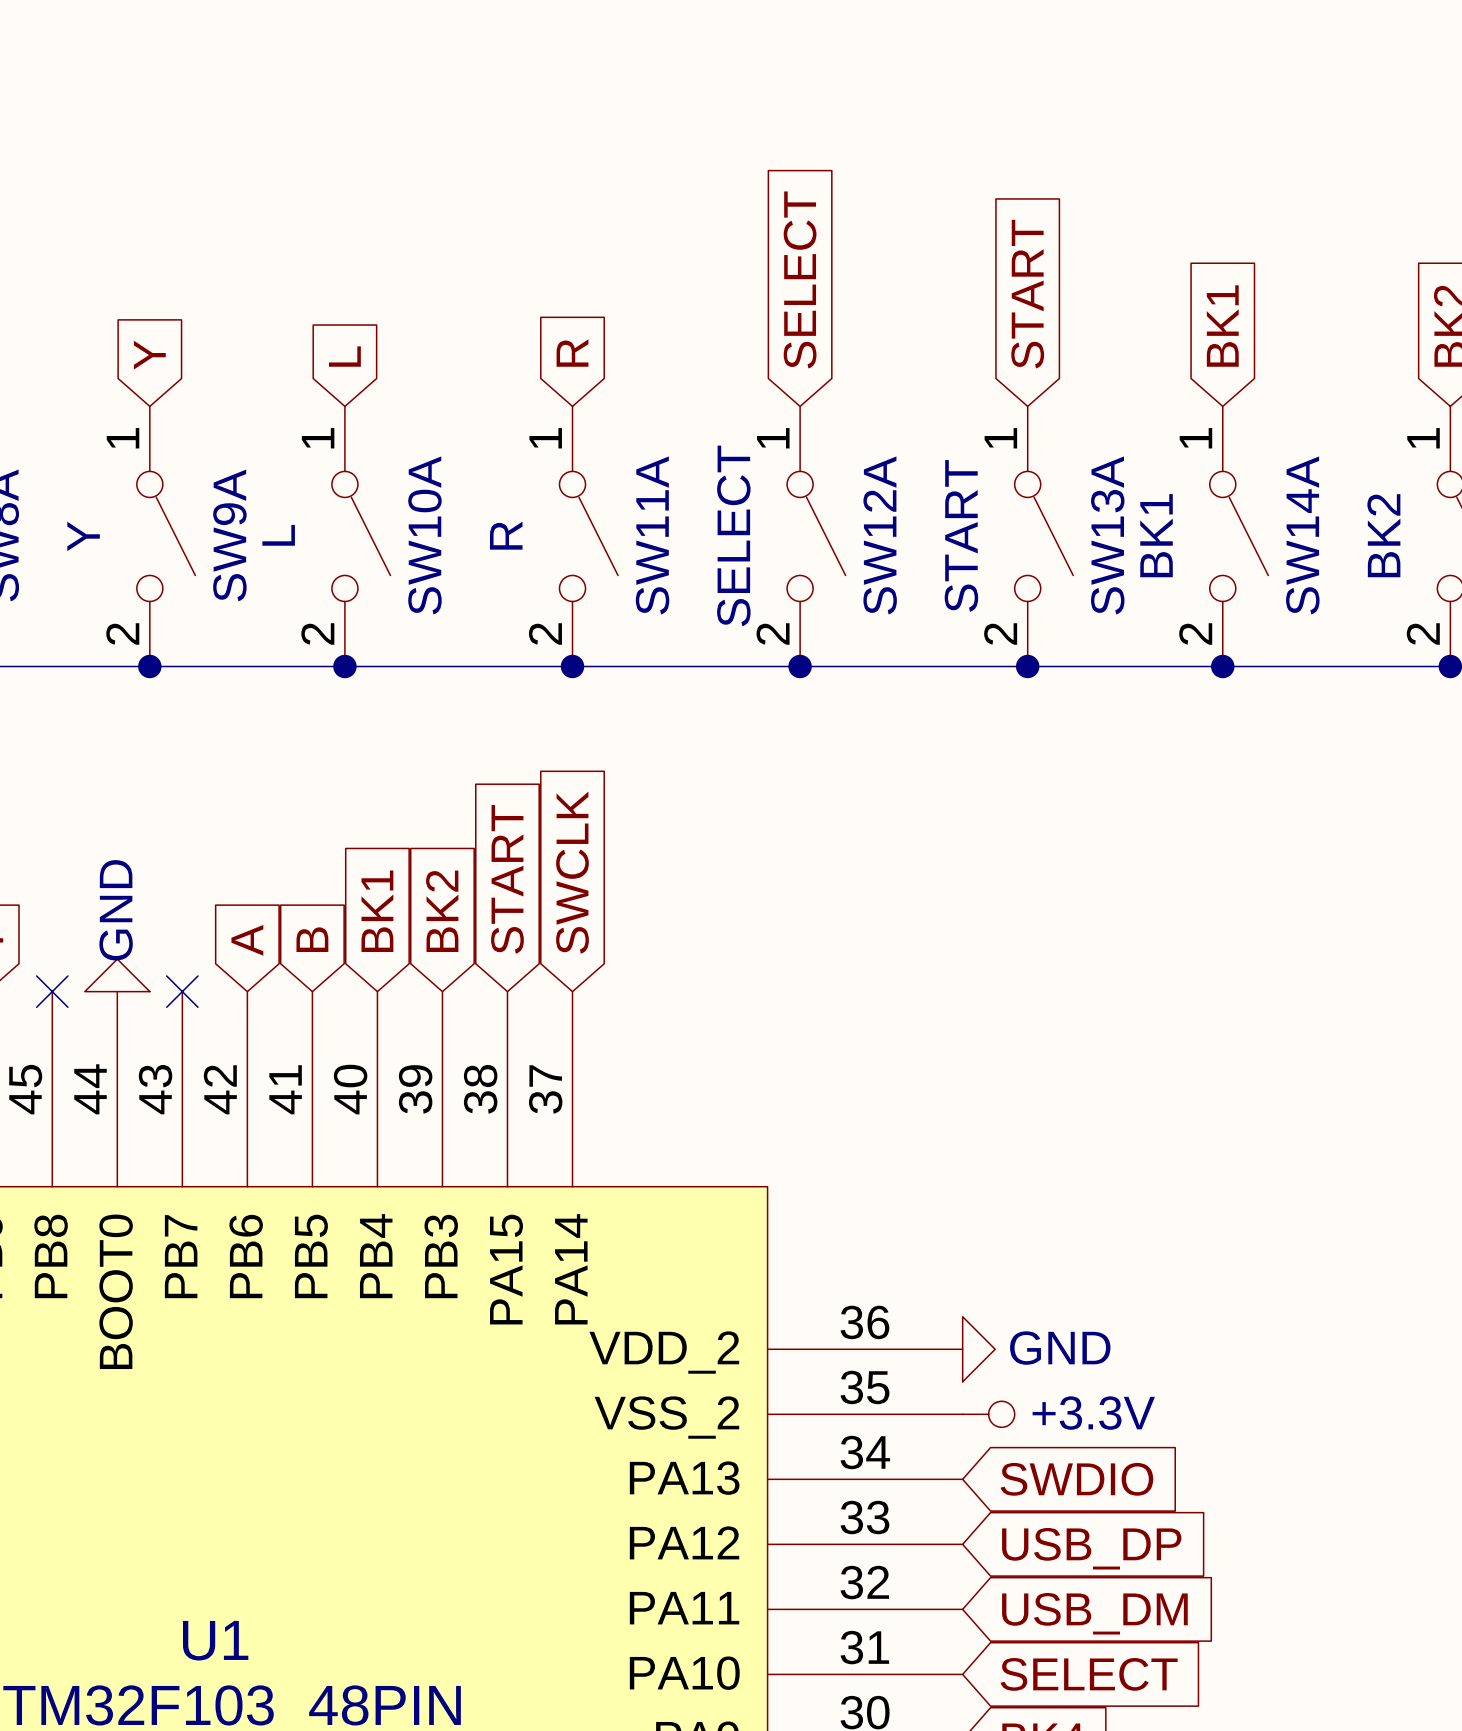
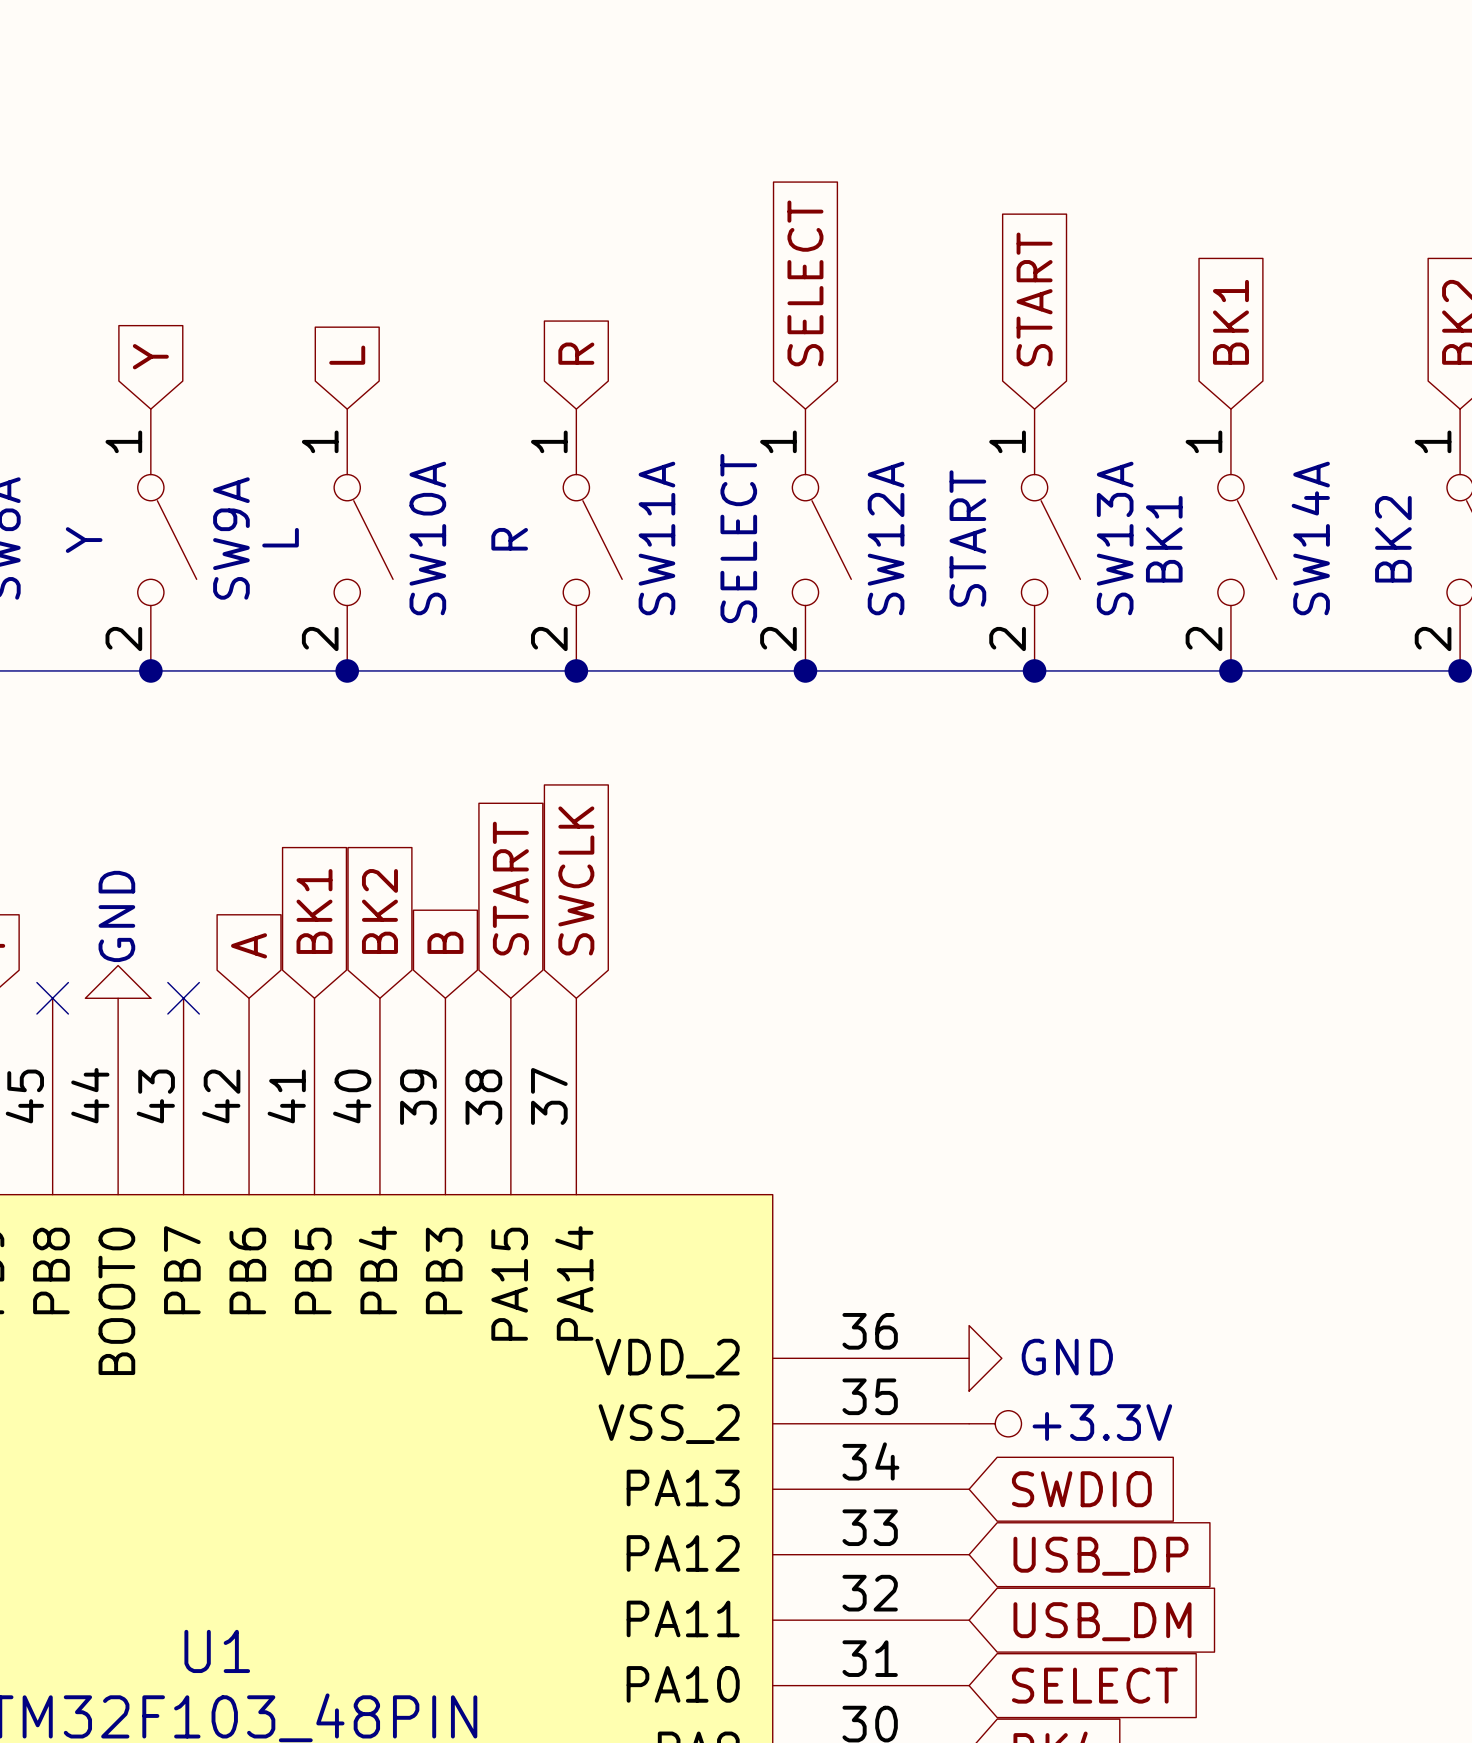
global label: BK1 (377, 911) -> BK2 (379, 911)
global label: BK2 (442, 911) -> B (445, 942)
global label: B (312, 939) -> BK1 (314, 911)

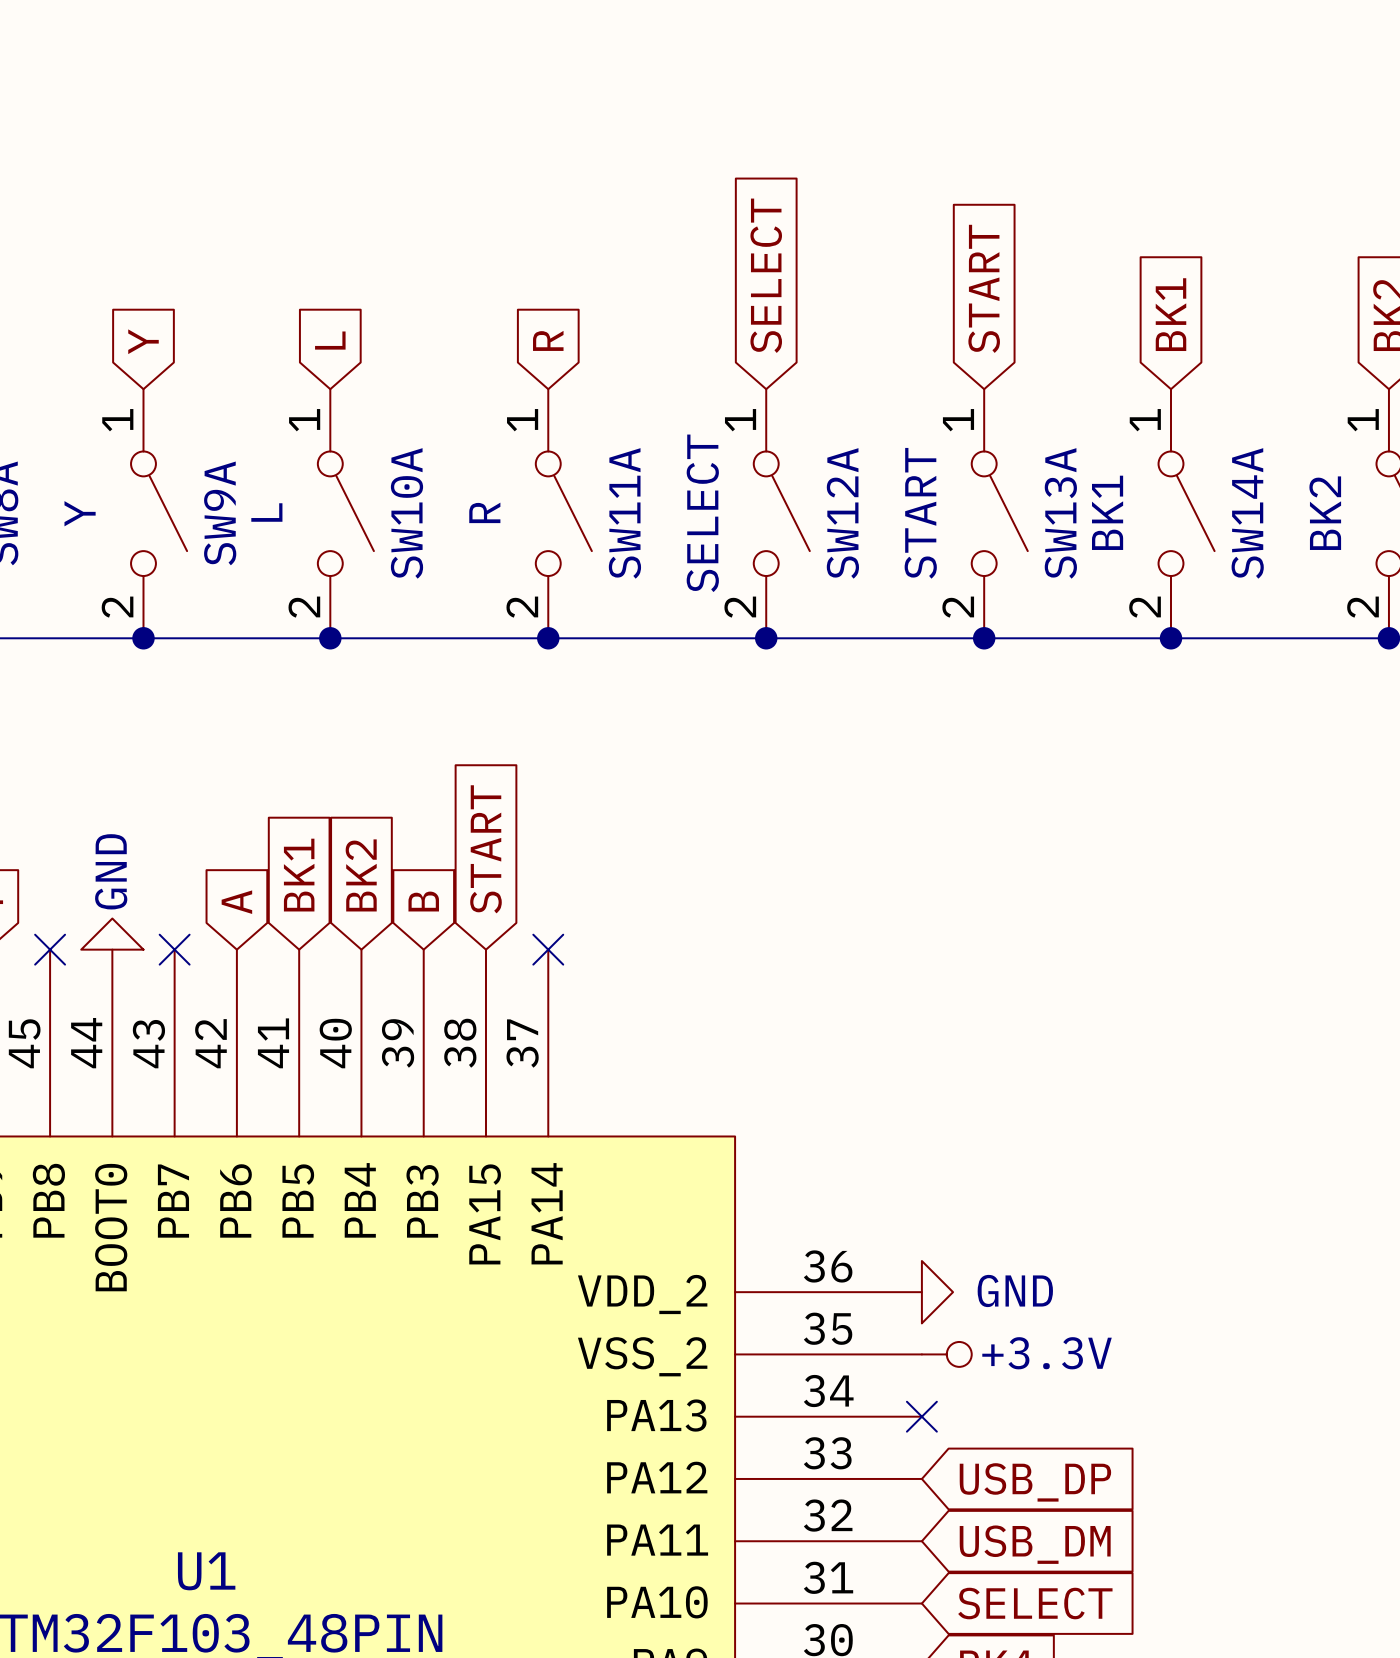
global label: SWCLK (576, 880) -> none
no-connect mark: none -> (548, 949)
no-connect mark: none -> (921, 1416)
global label: SWDIO (1081, 1489) -> none

